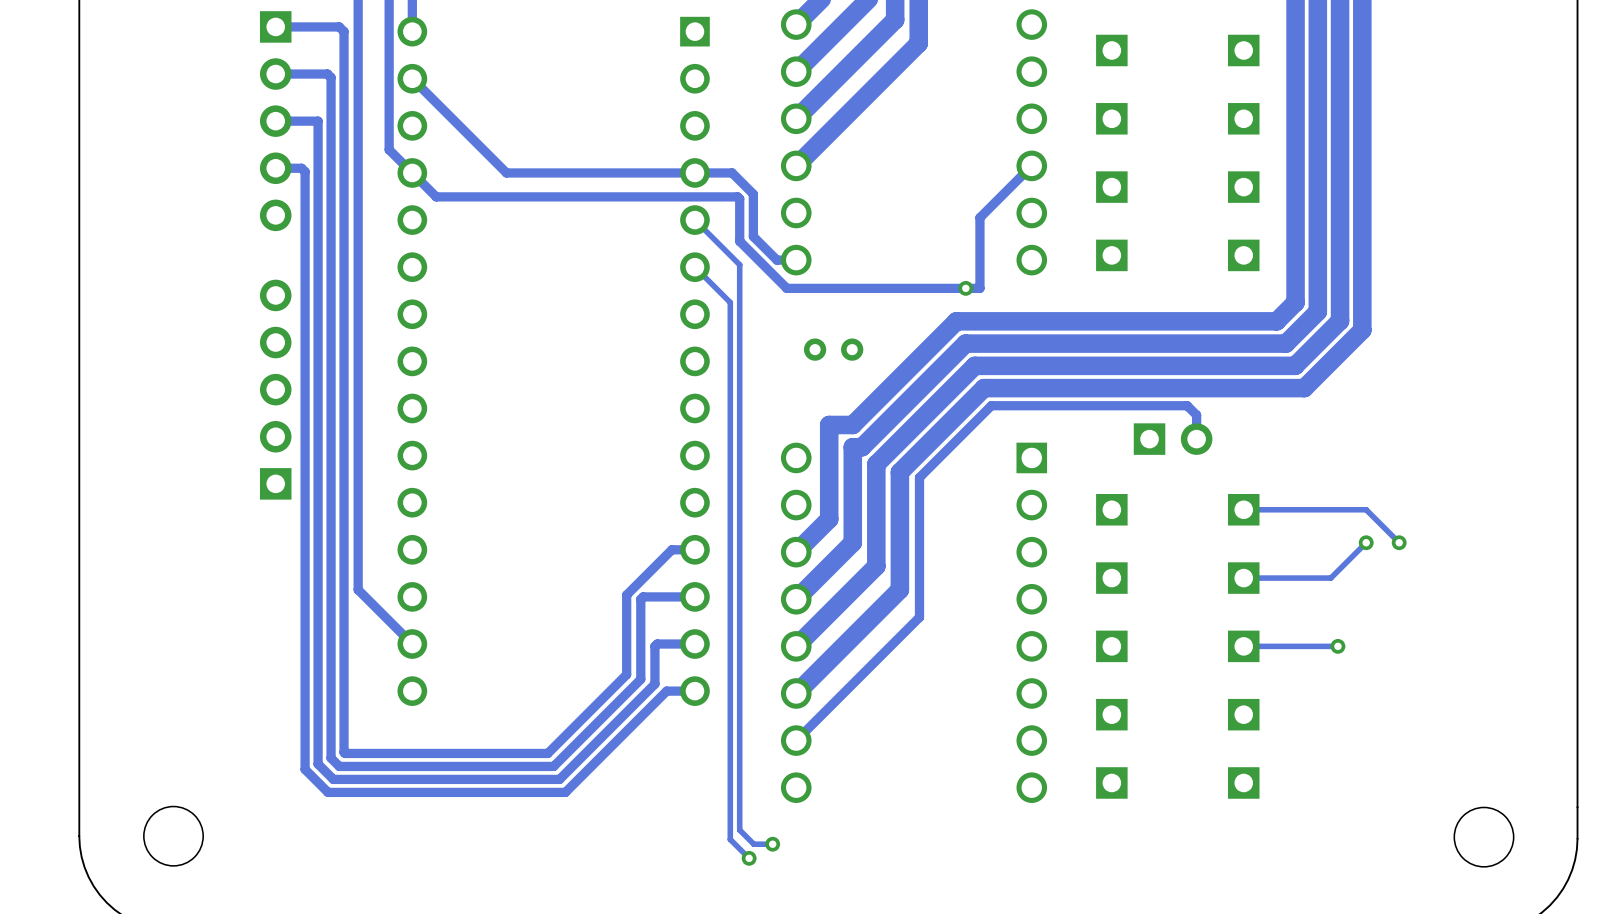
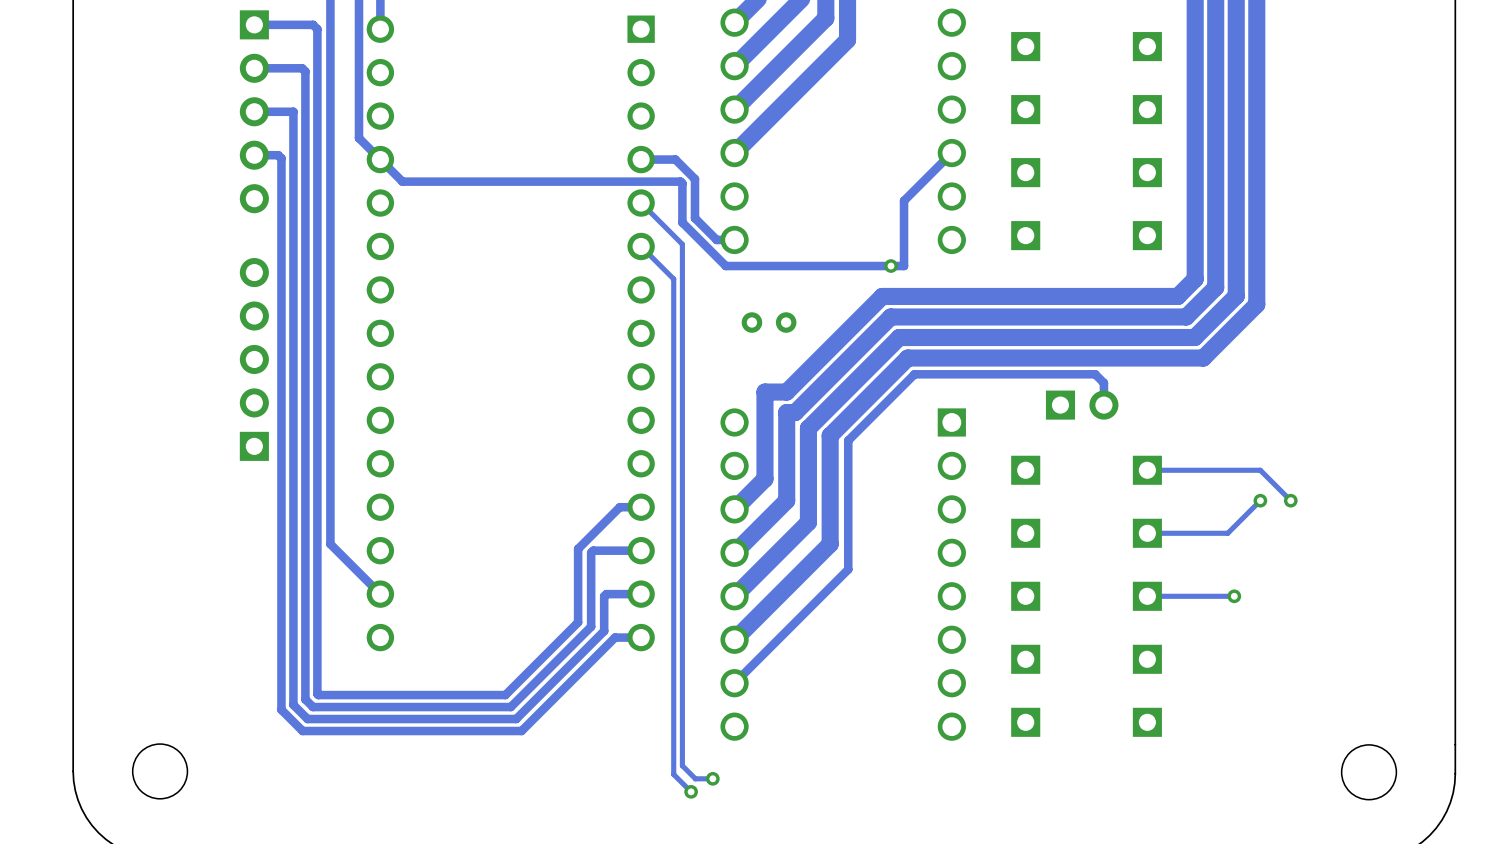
track: (412, 78) (506, 172) (694, 172) -> none

